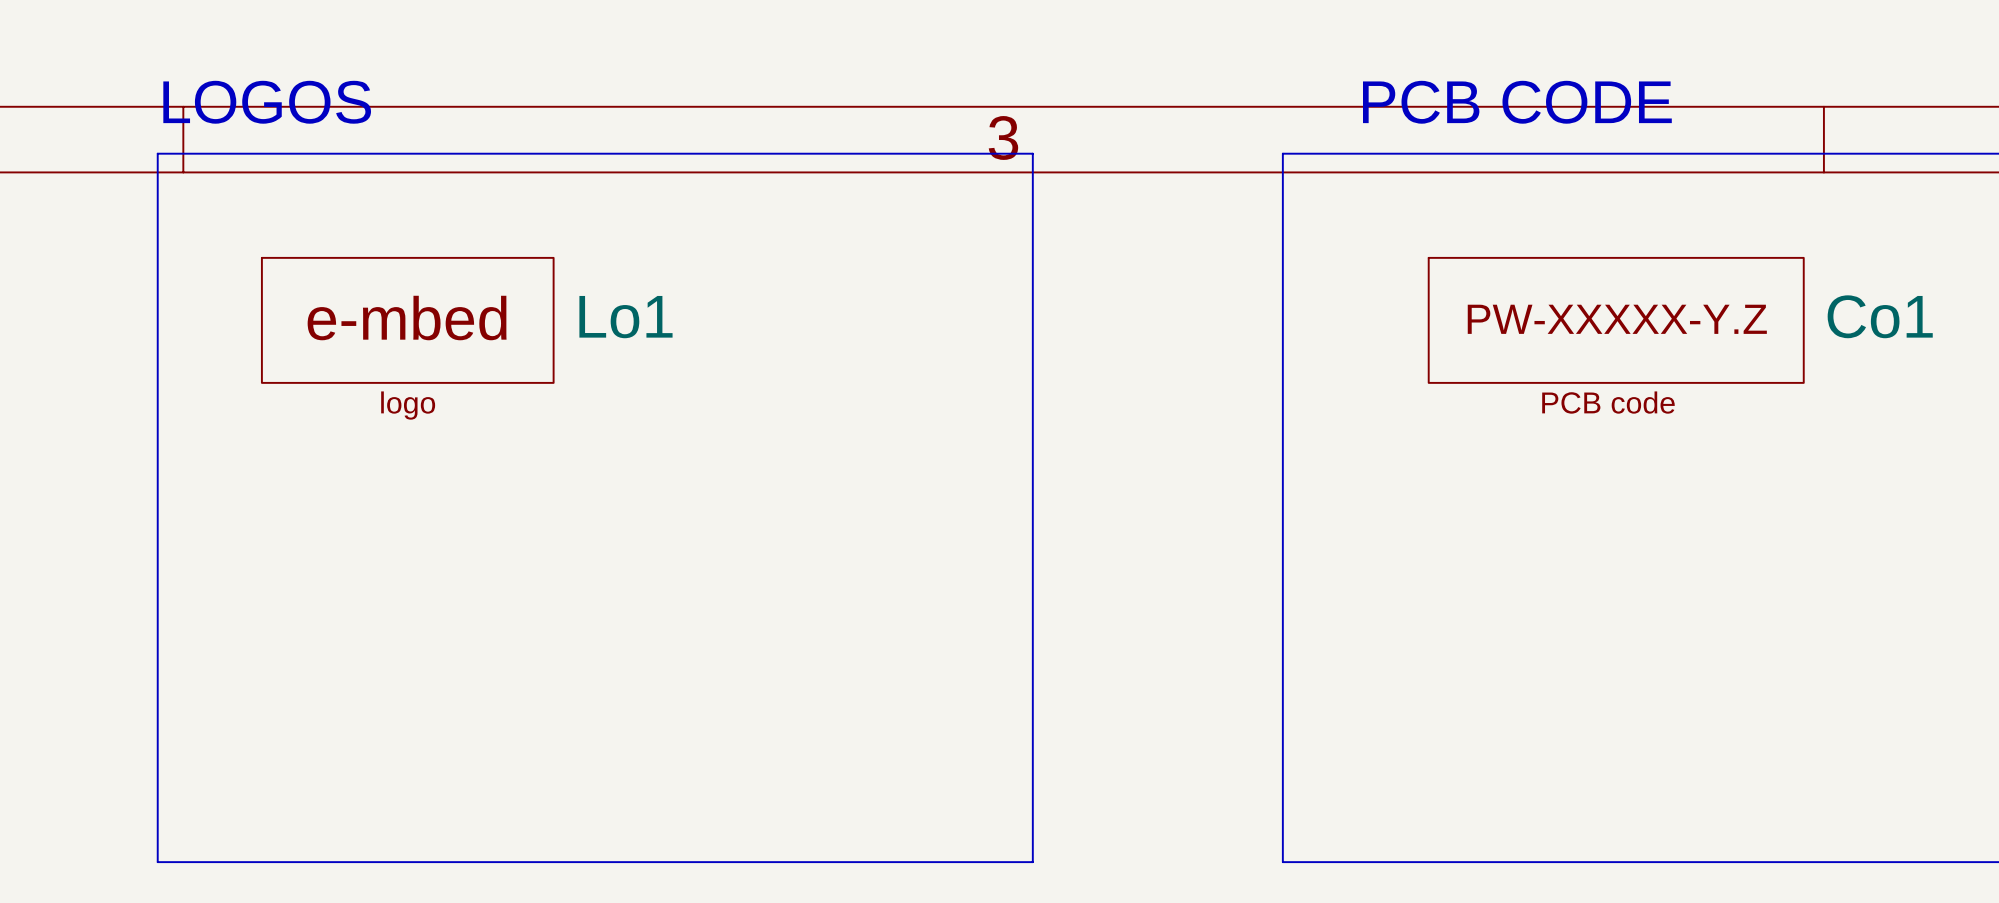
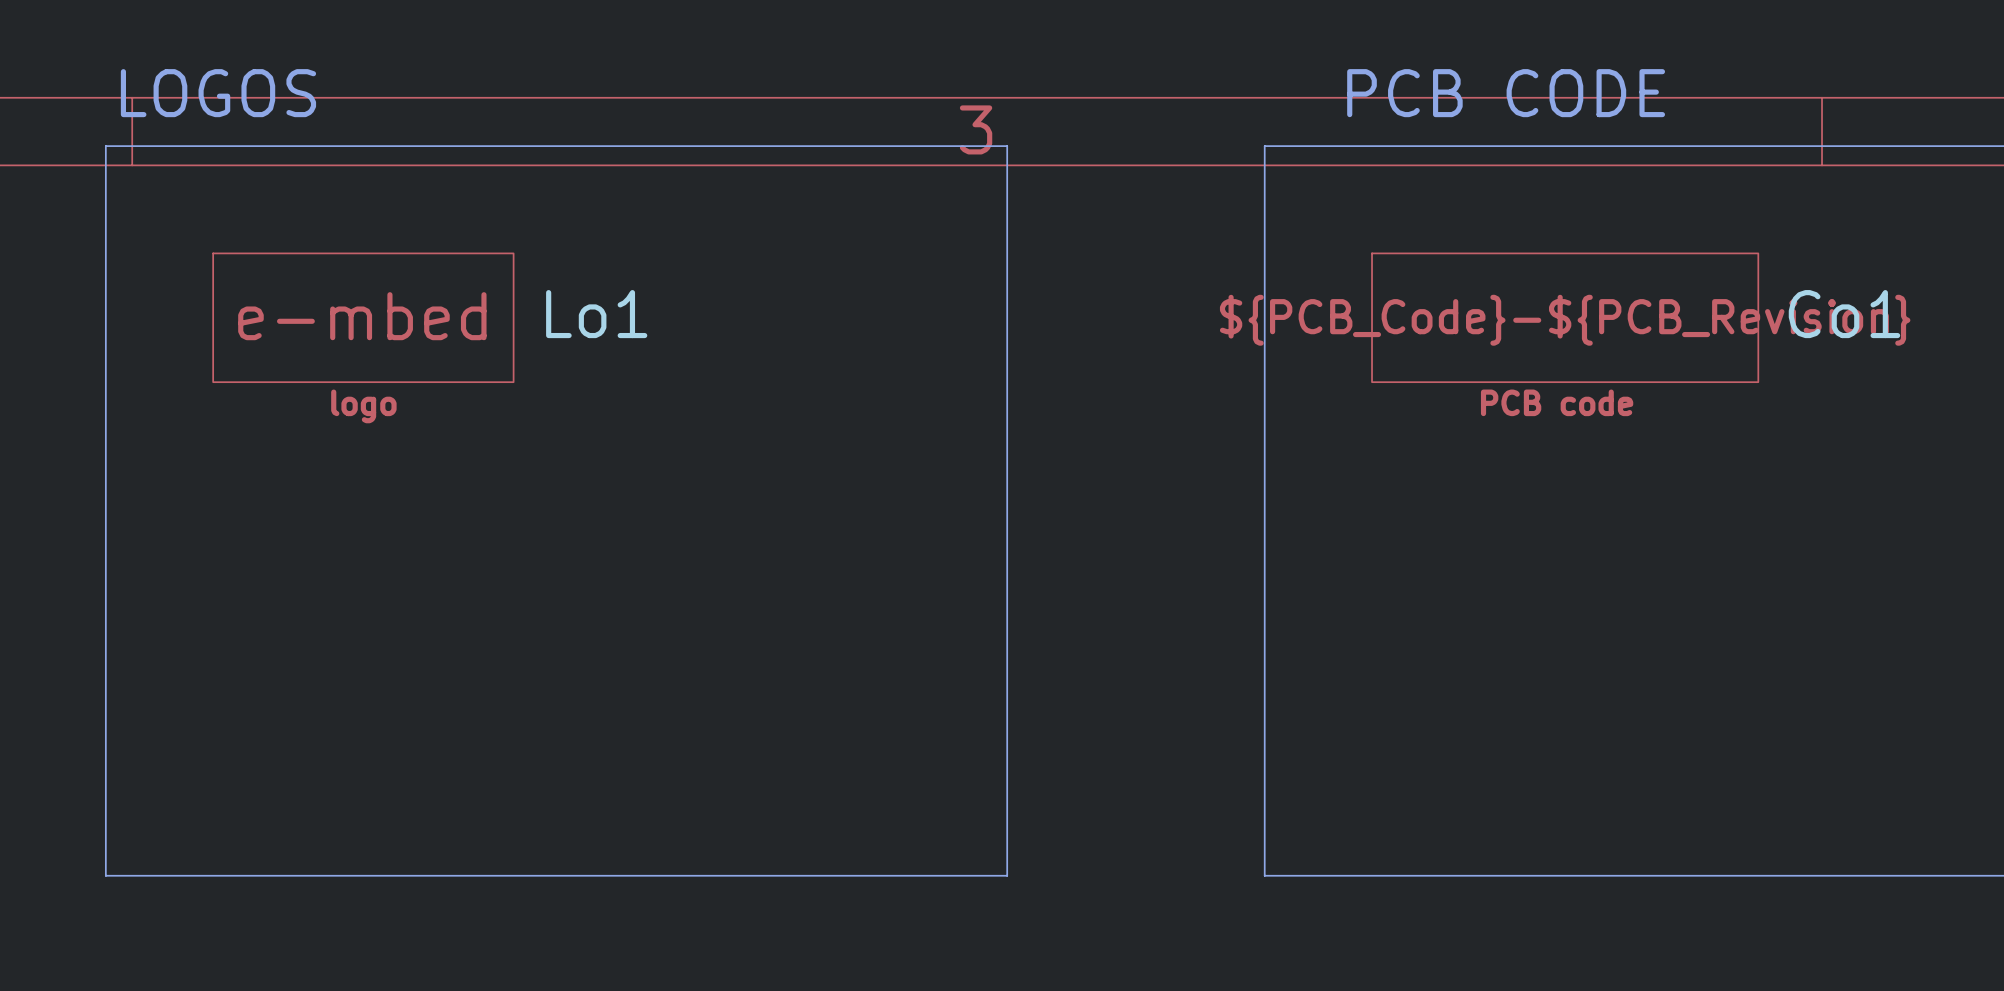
Co1 text: PW-XXXXX-Y.Z (1617, 319) -> ${PCB_Code}-${PCB_Revision} (1565, 320)
Co1 position: (1616, 320) -> (1565, 317)

